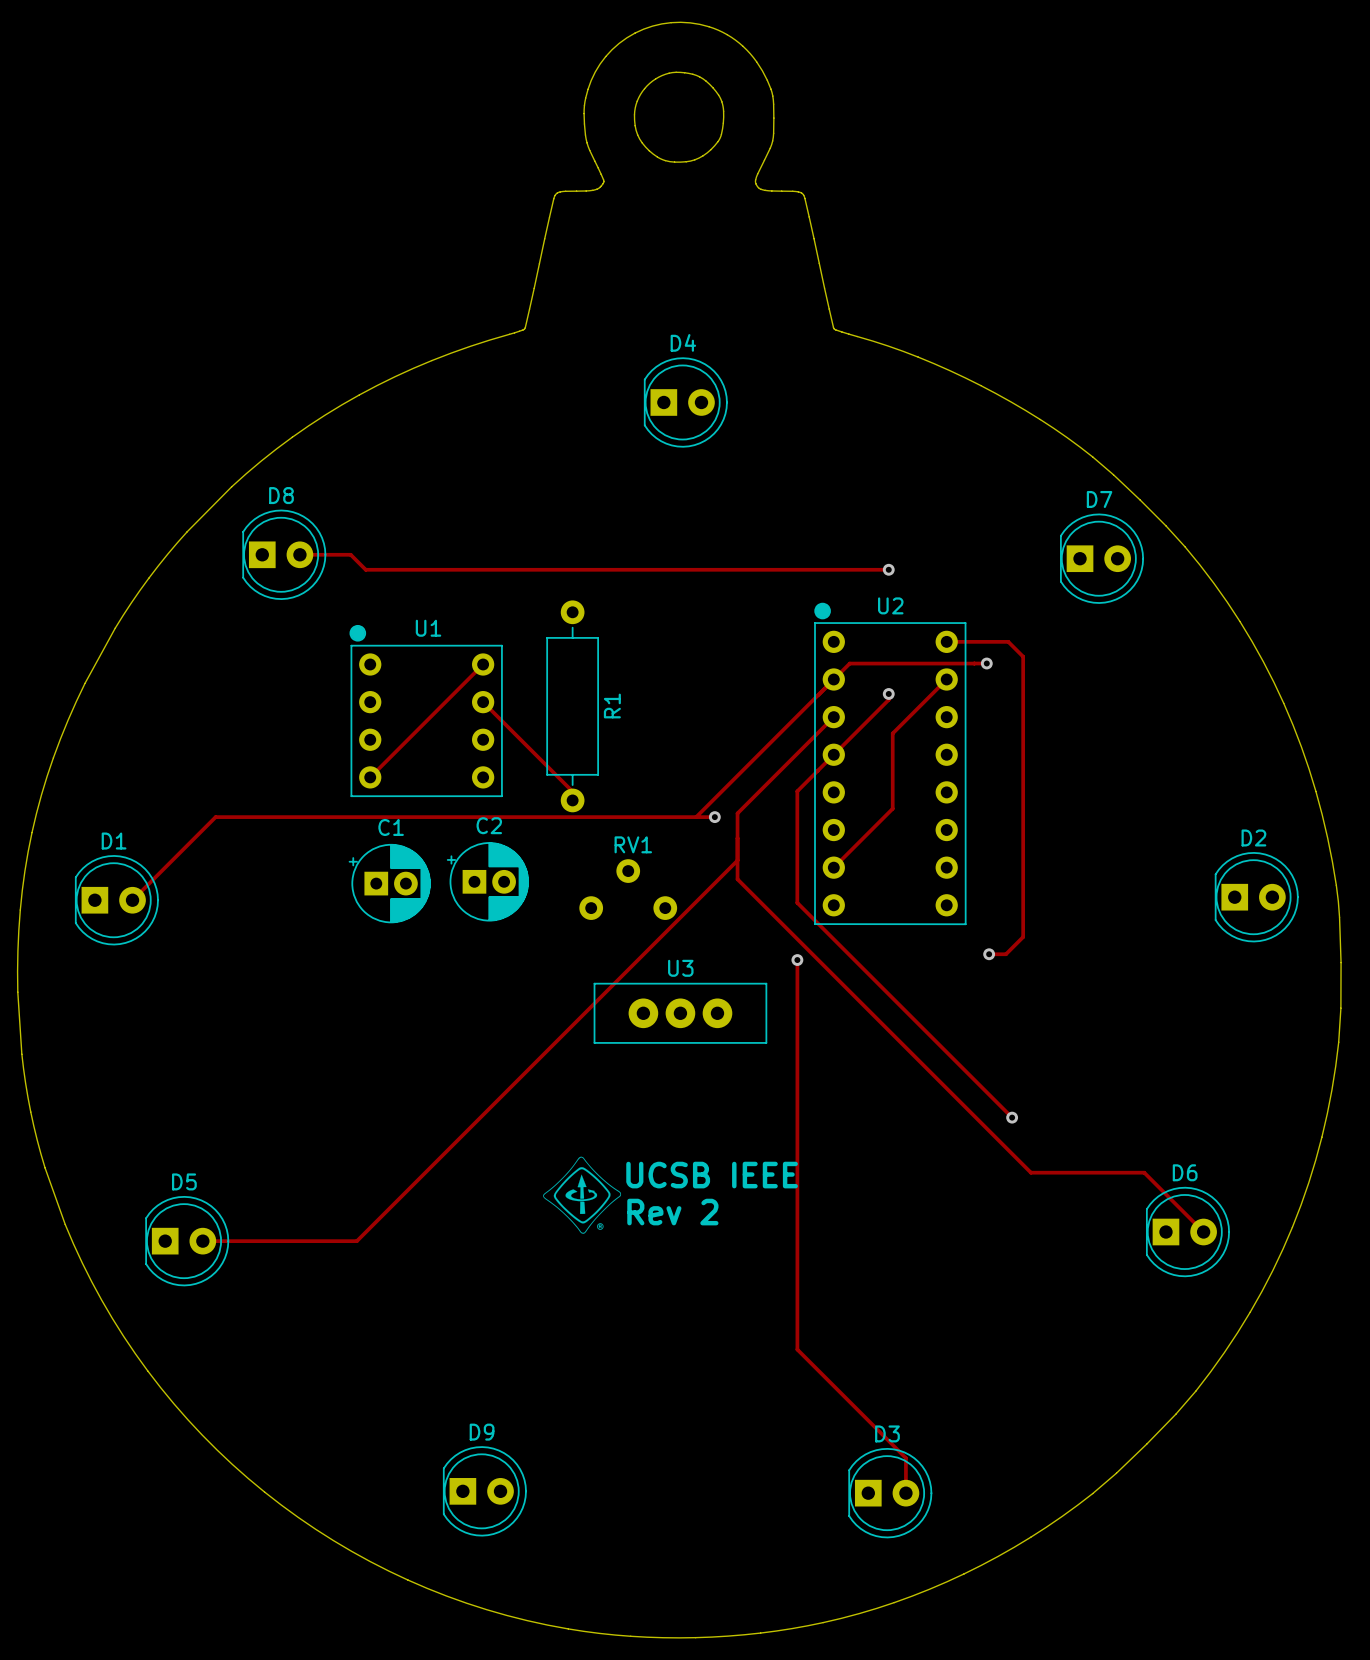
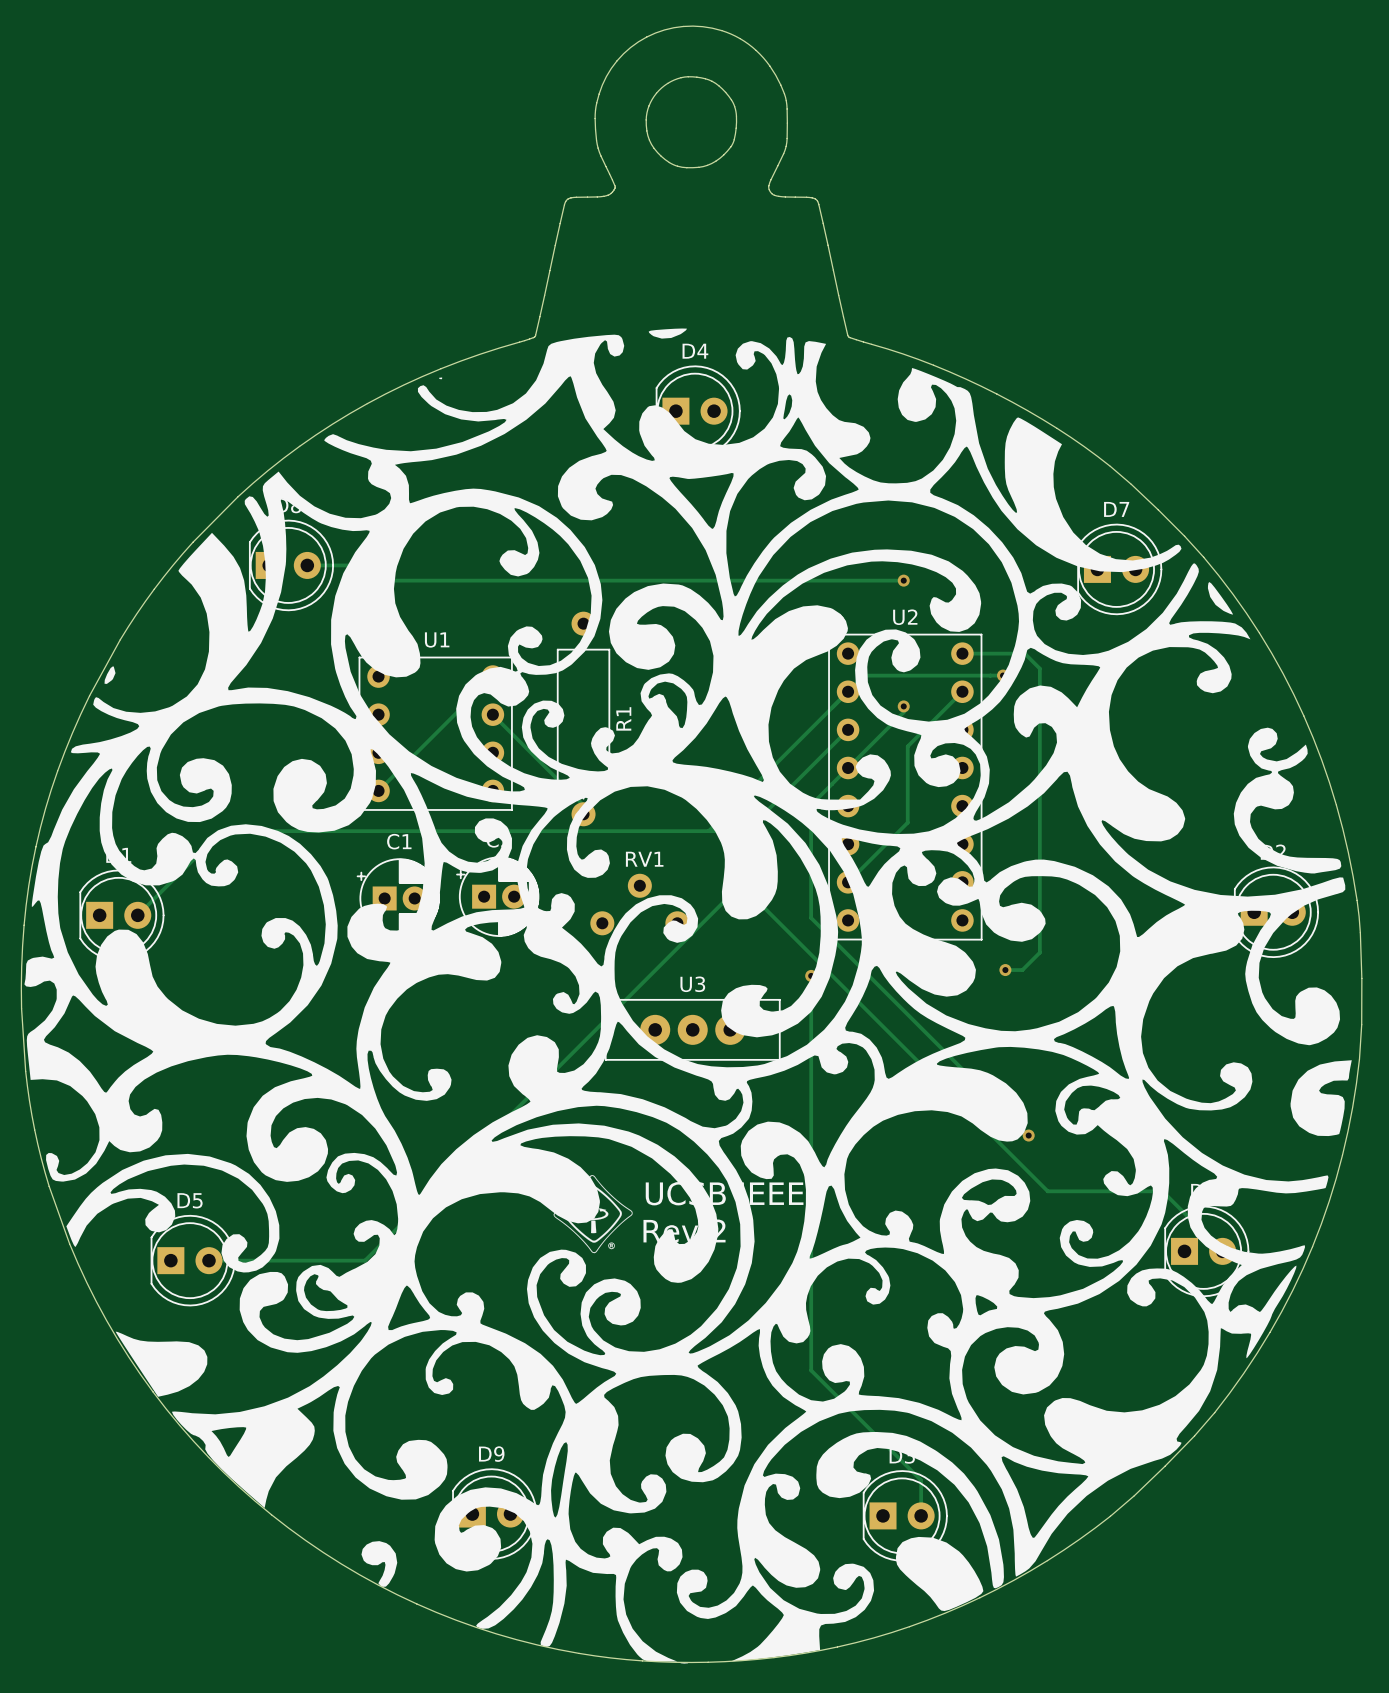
drawing: none -> [24, 328, 1352, 1664]

